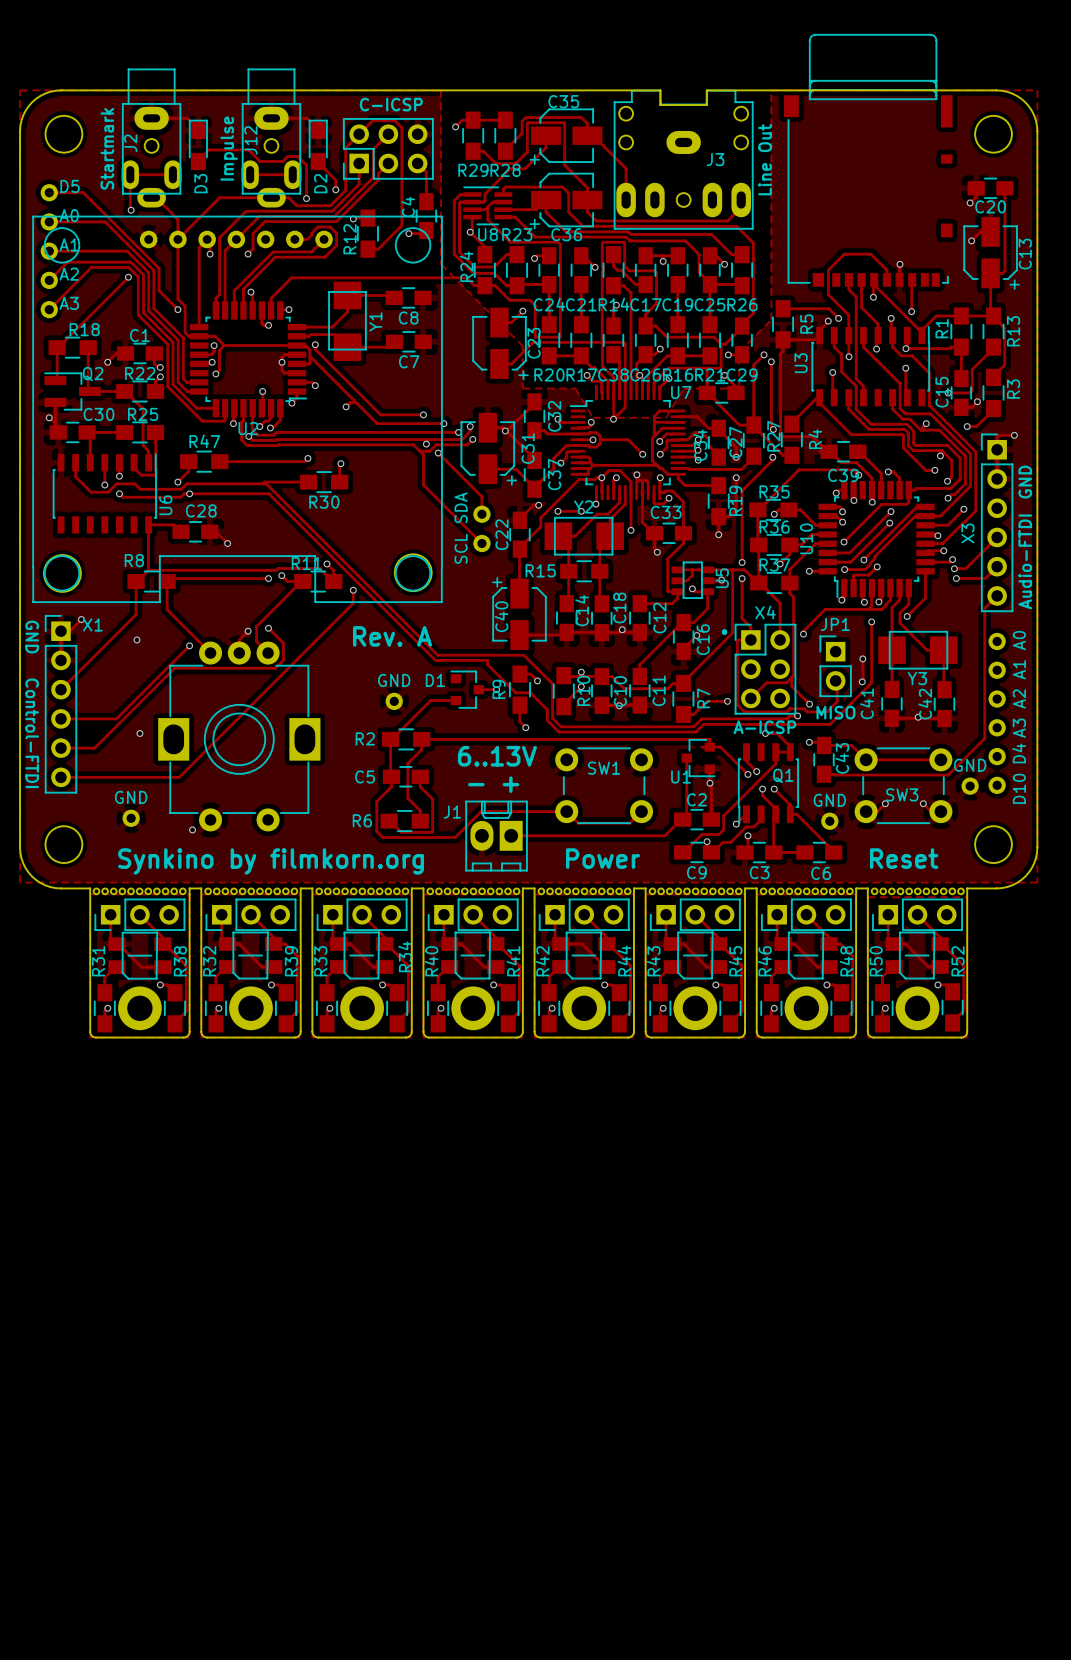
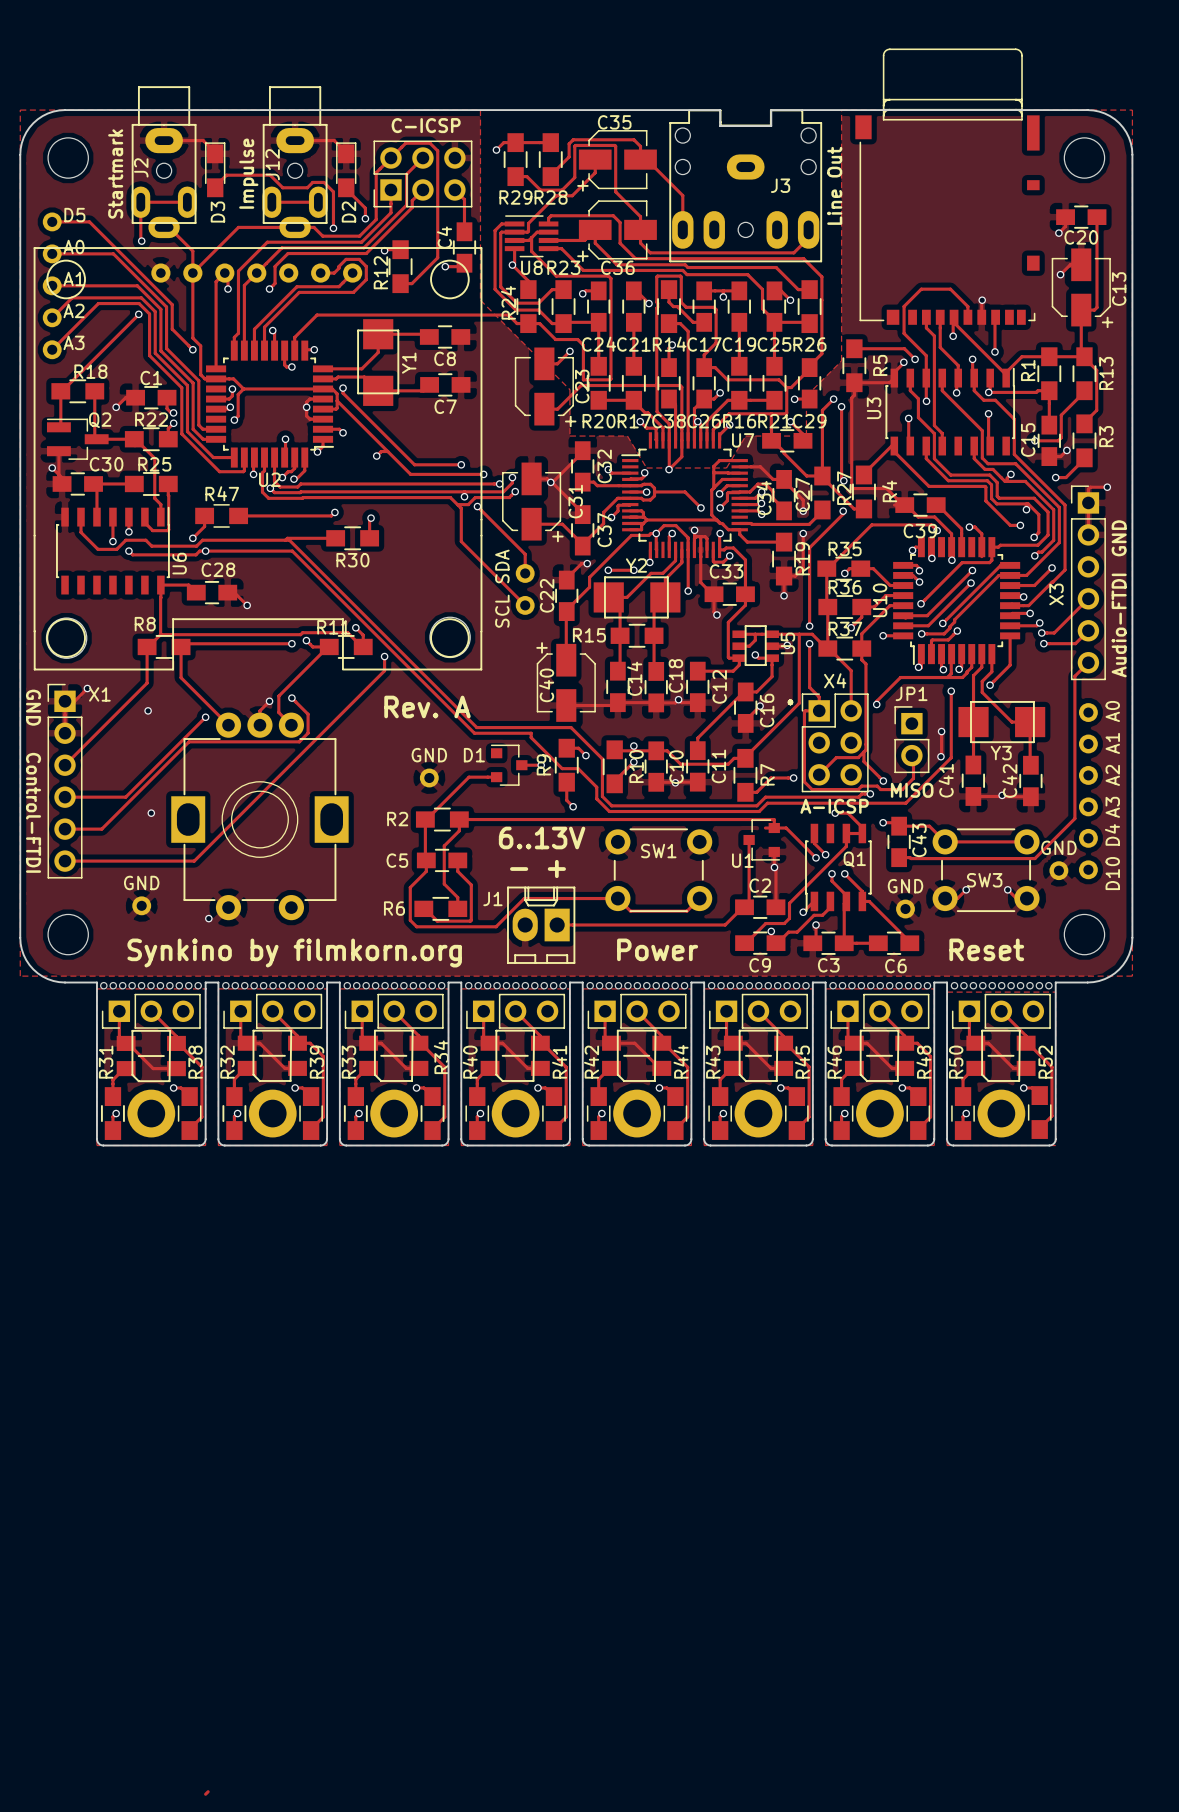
track: none -> (208, 1791) (205, 1794)

